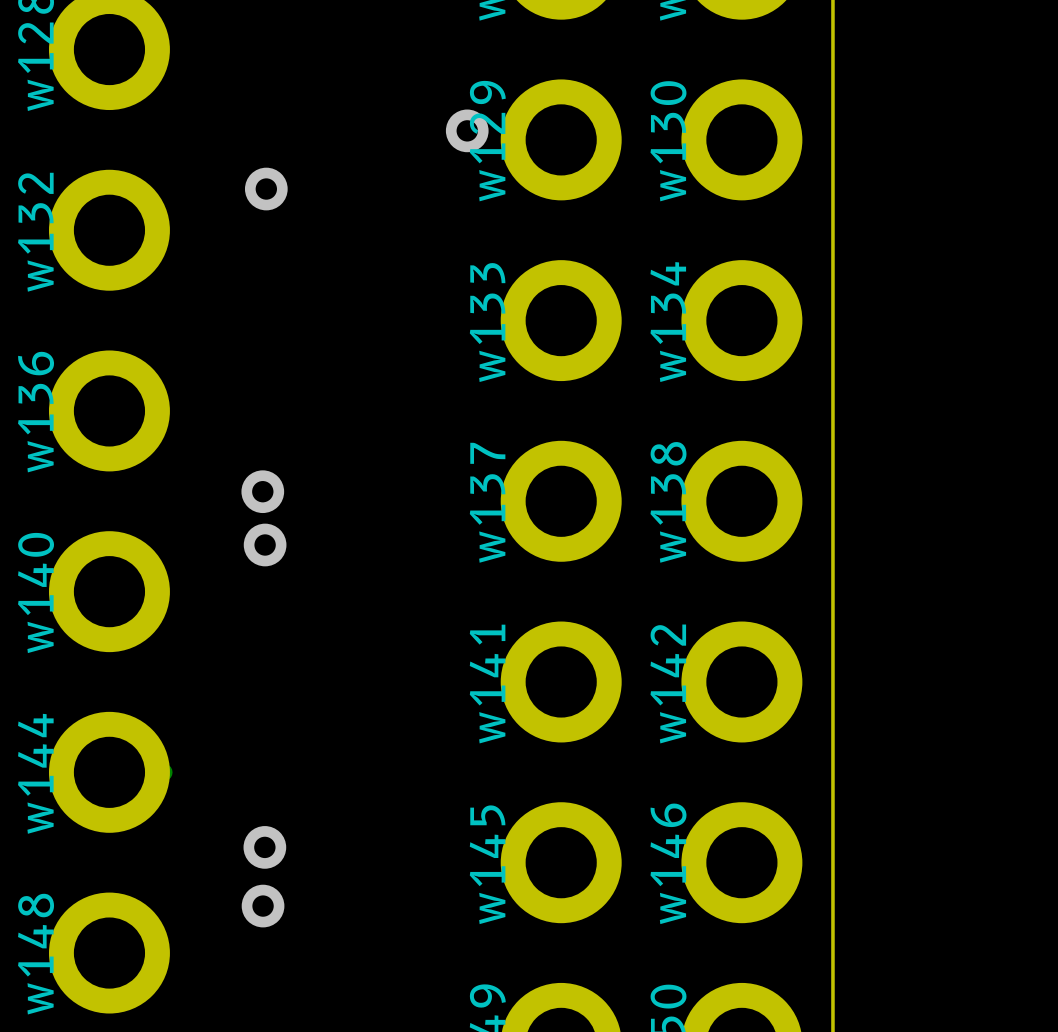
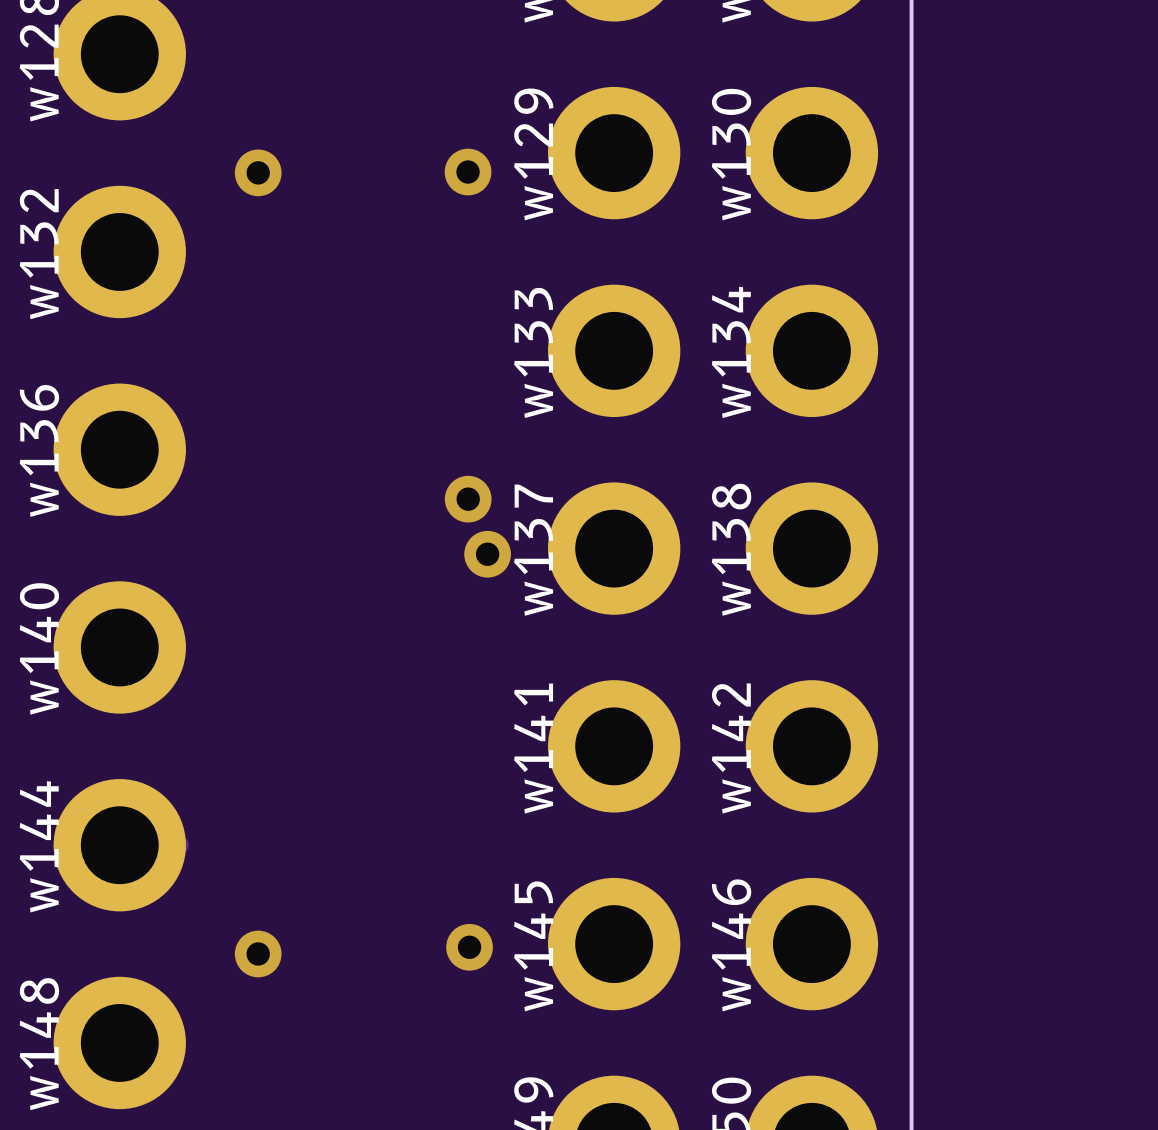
via position: (467, 130) -> (468, 172)
via position: (266, 189) -> (258, 172)
via: none -> (468, 499)
via: (262, 491) -> none
via: none -> (487, 554)
via: (265, 545) -> none
via: (264, 847) -> none
via: none -> (469, 947)
via: none -> (258, 953)
via: (263, 906) -> none

